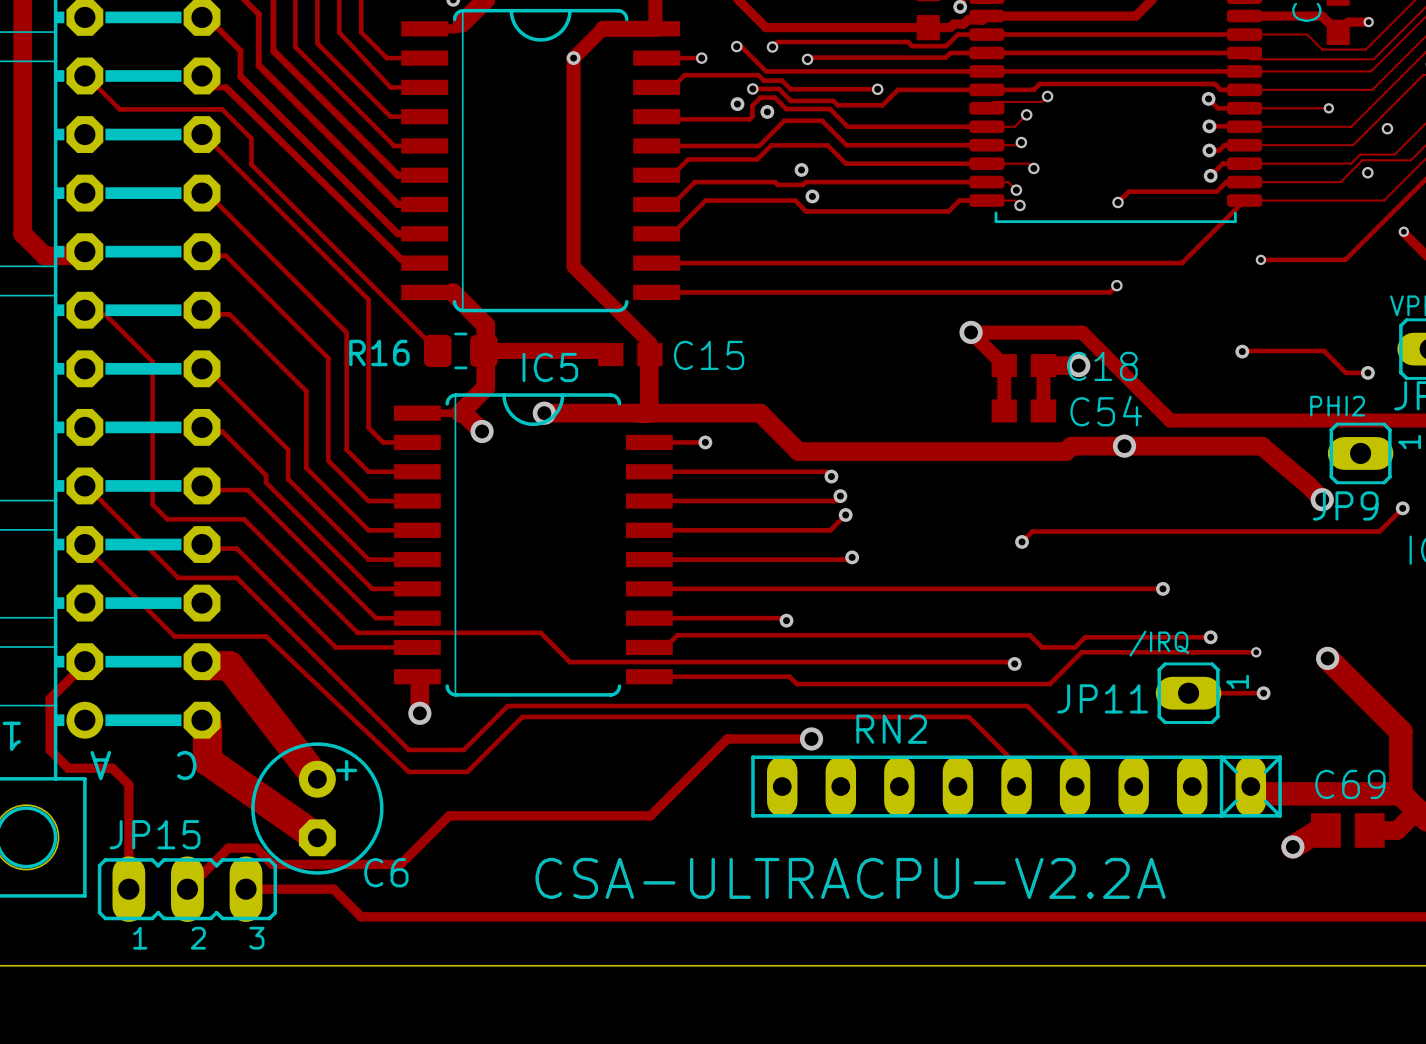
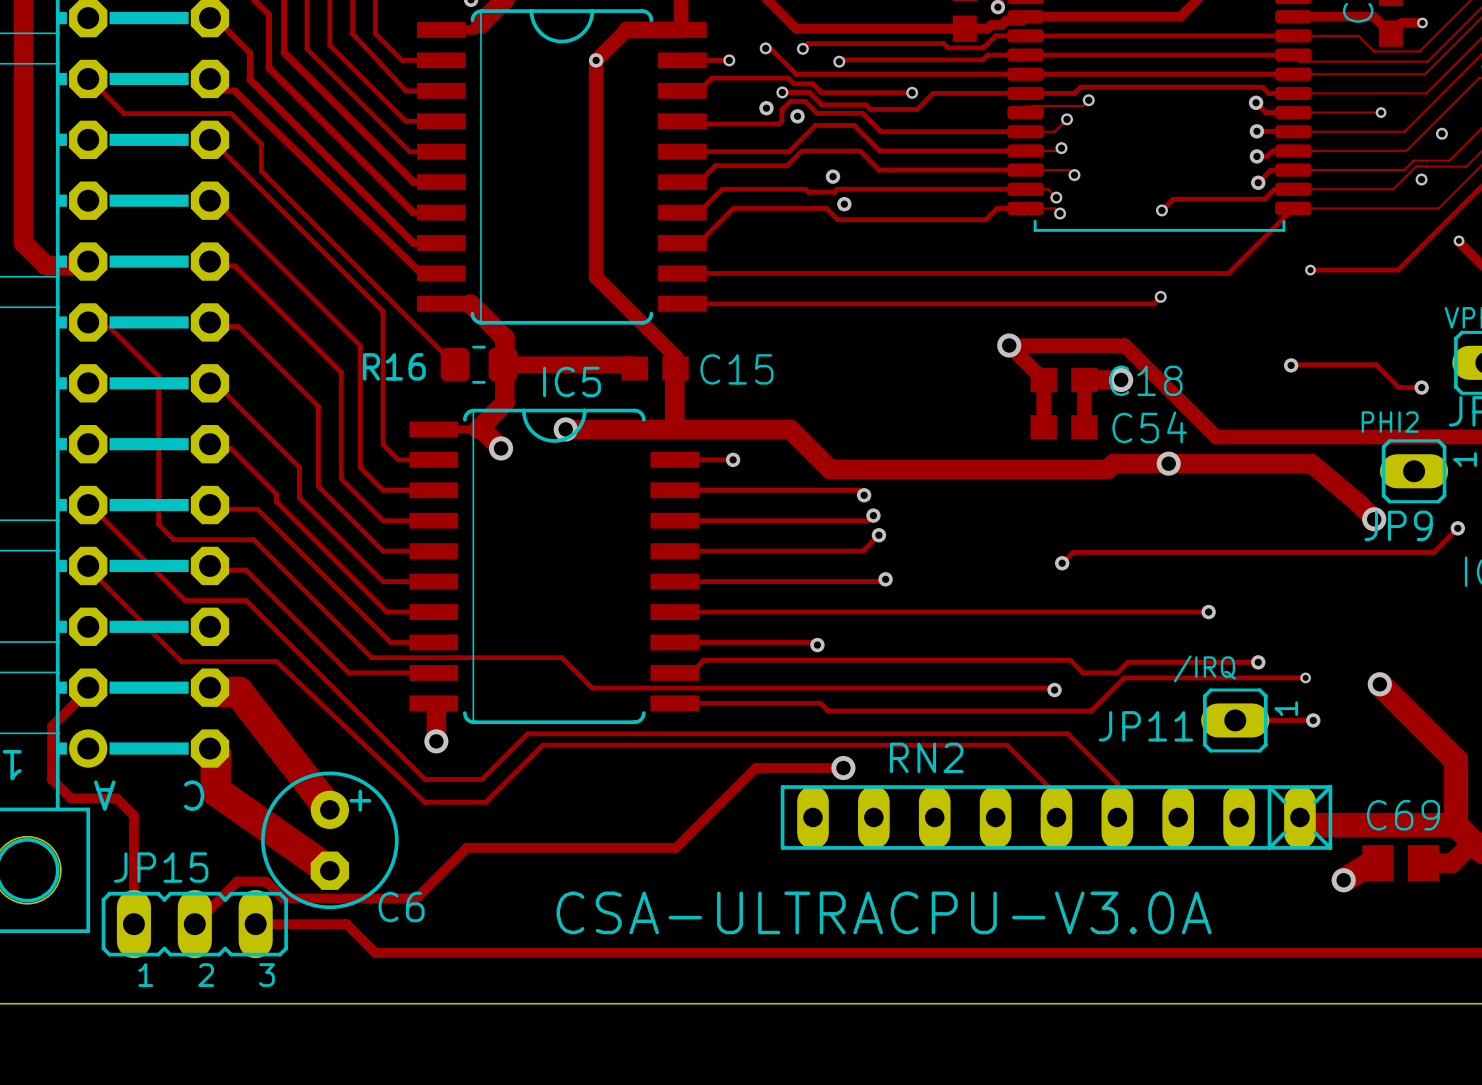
text: CSA-ULTRACPU-V2.2A (850, 878) -> none
text: none -> CSA-ULTRACPU-V3.0A (884, 912)

